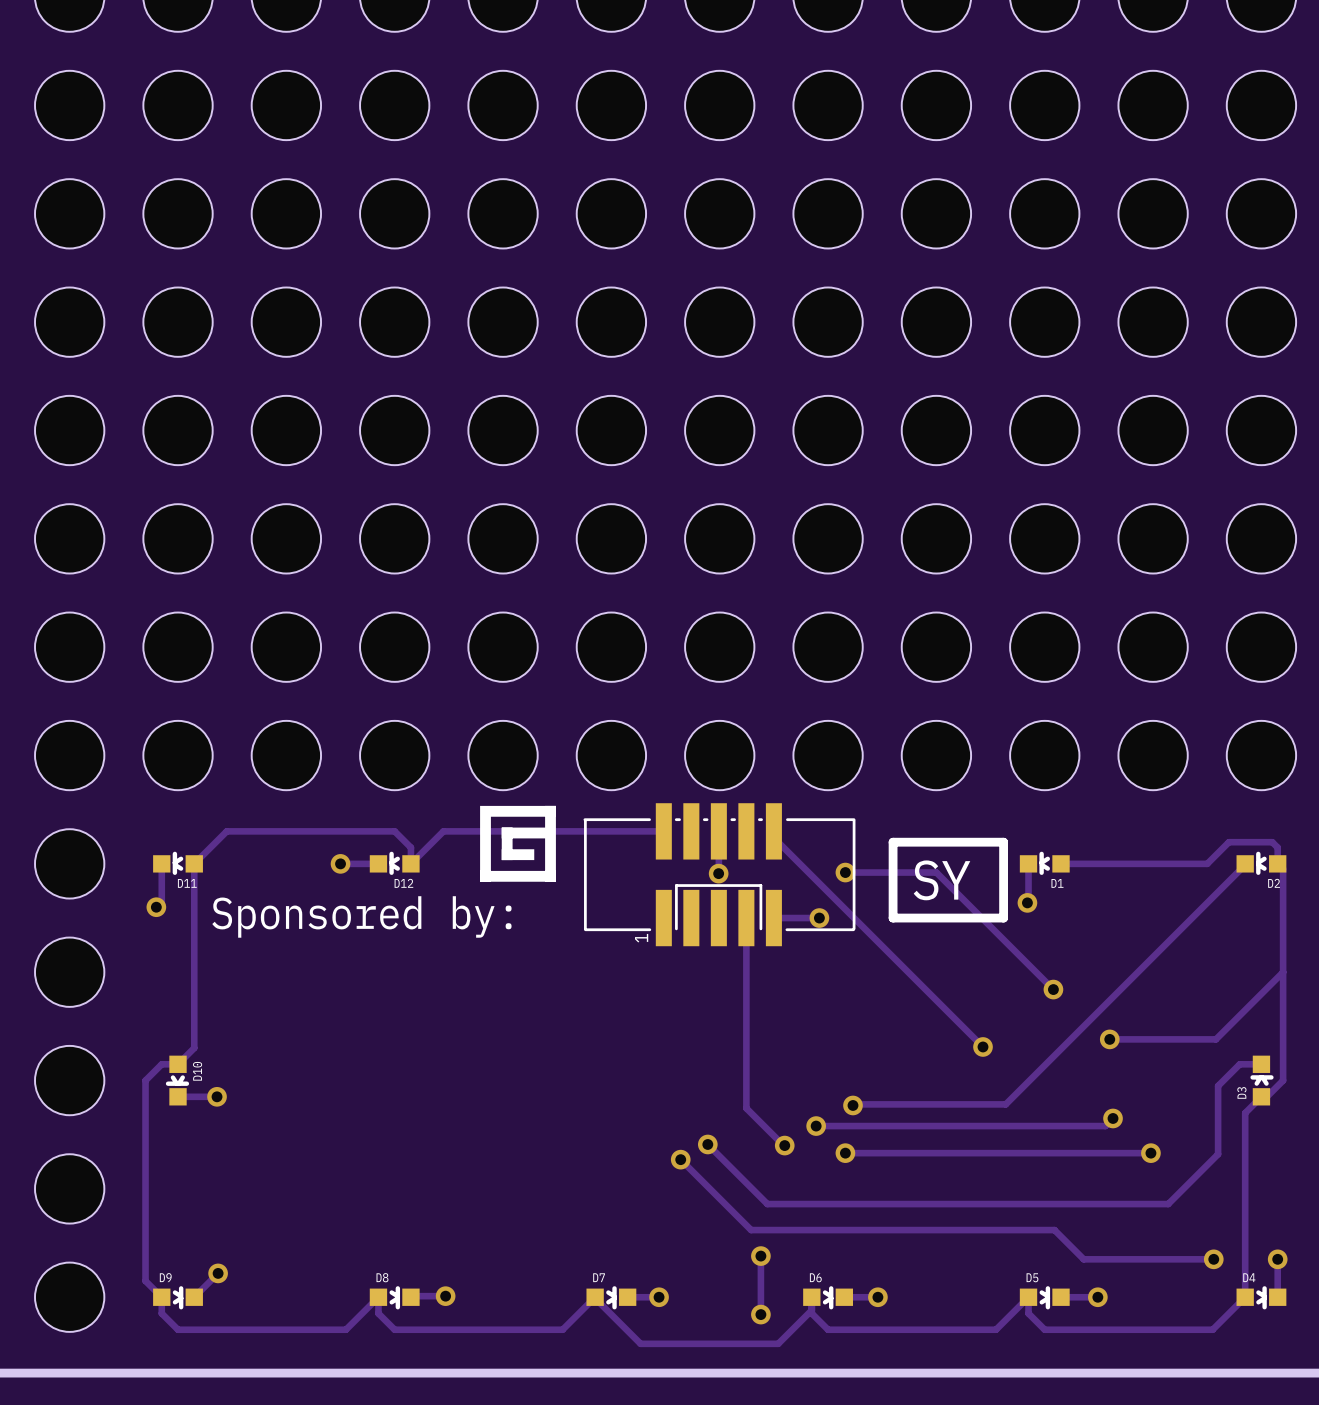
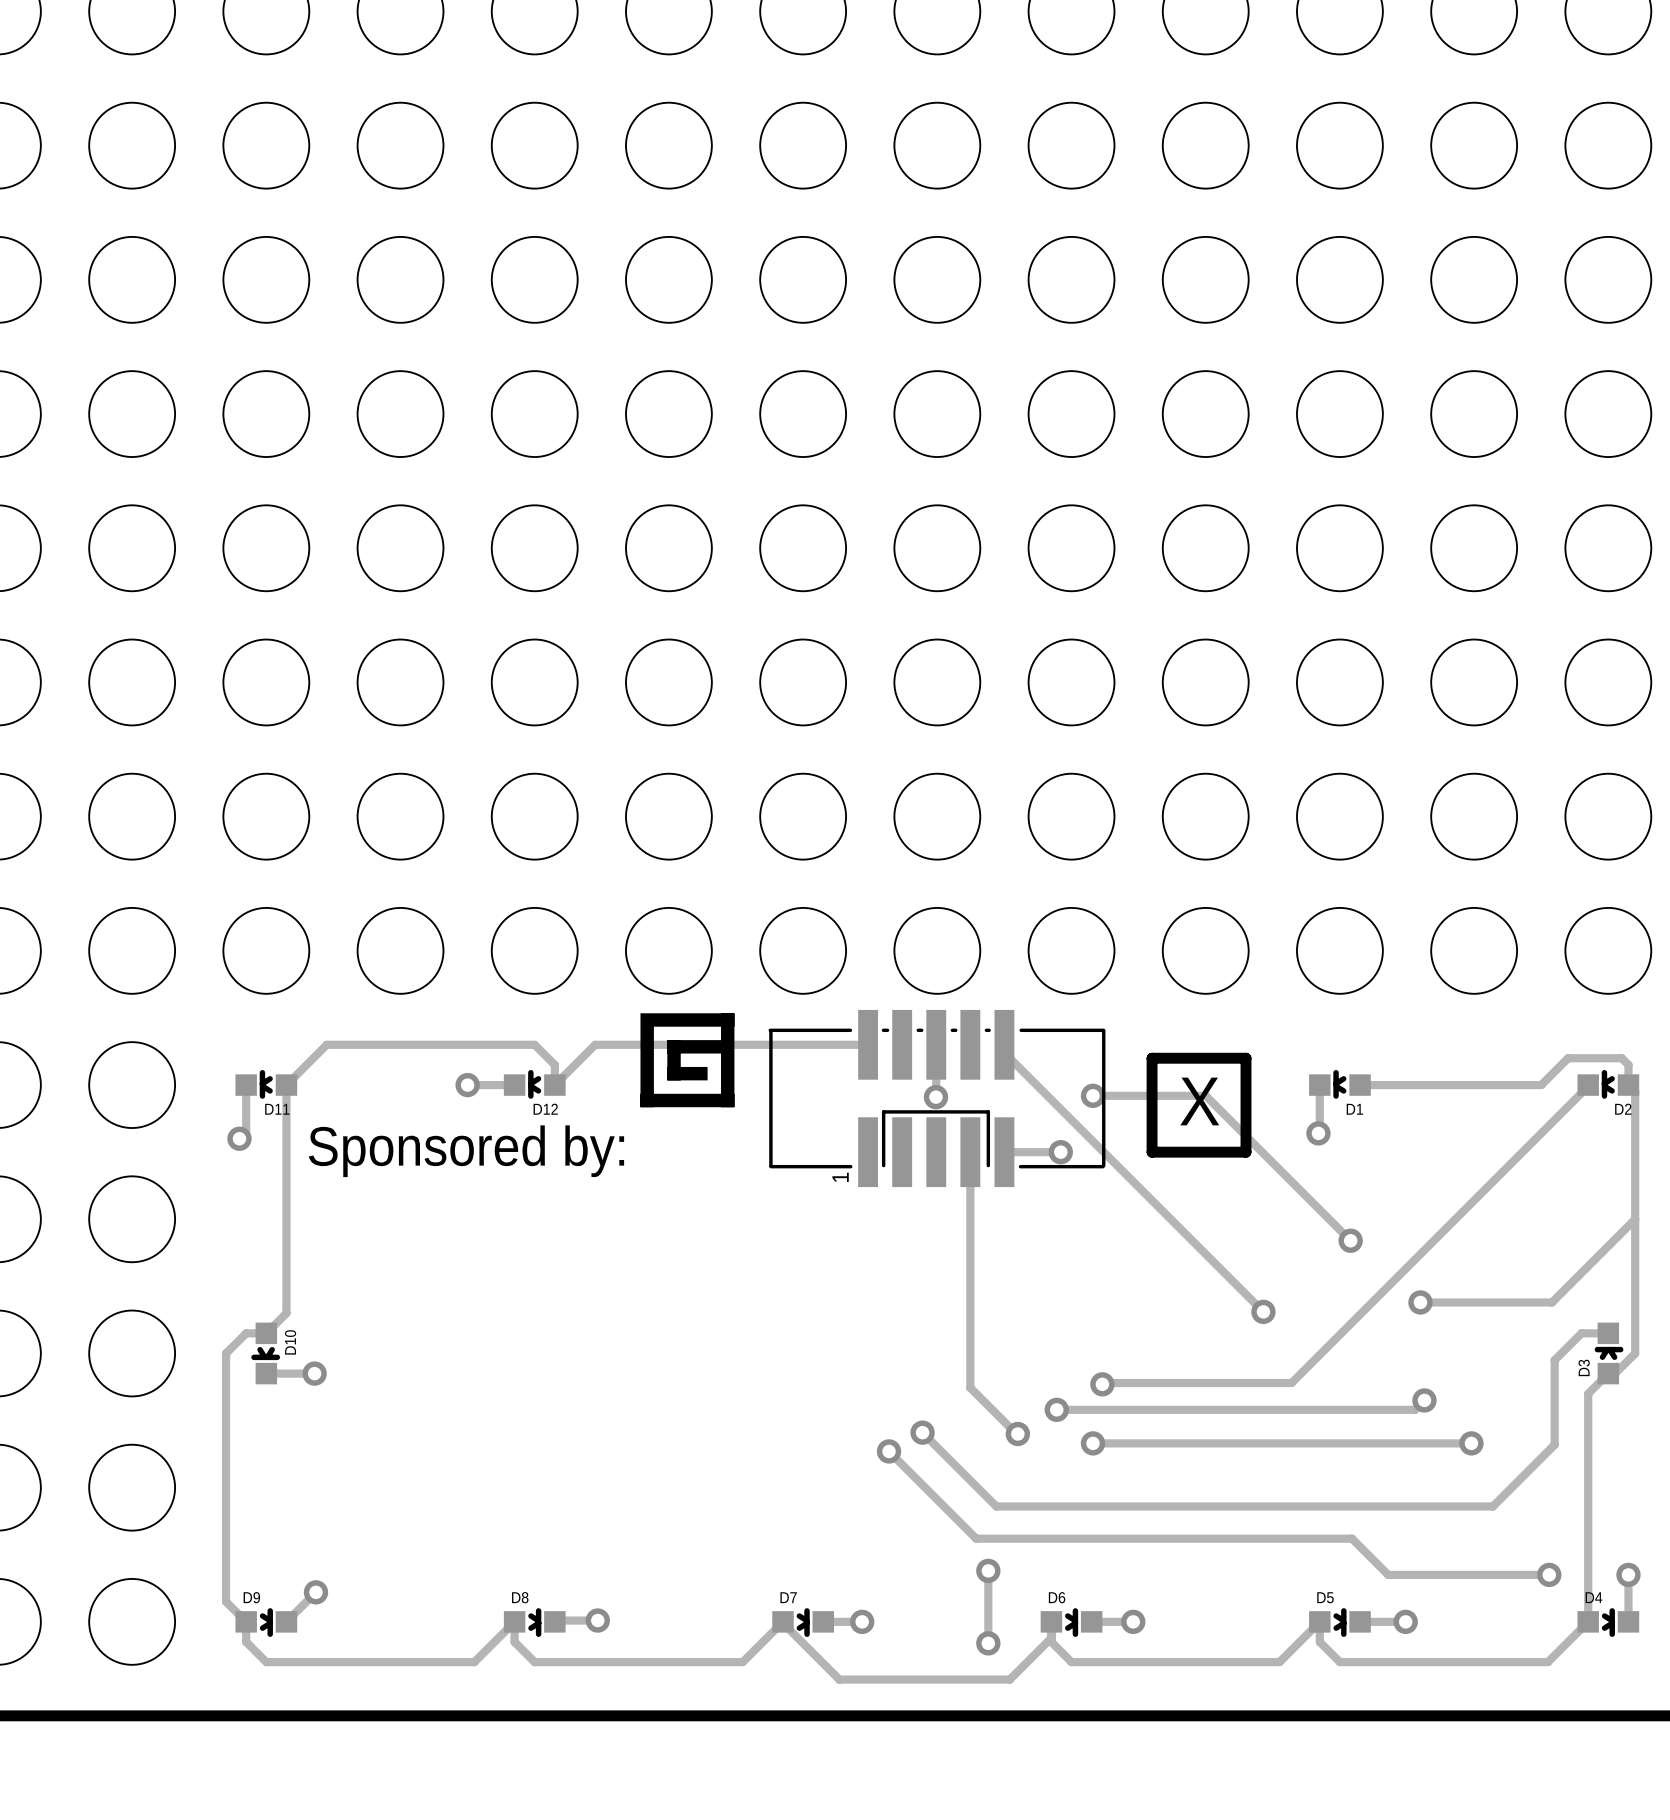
line: (968, 842) (1003, 842) (1003, 918) (968, 918) -> (1245, 1058) (1245, 1152)
text: SY (942, 880) -> X (1199, 1101)

